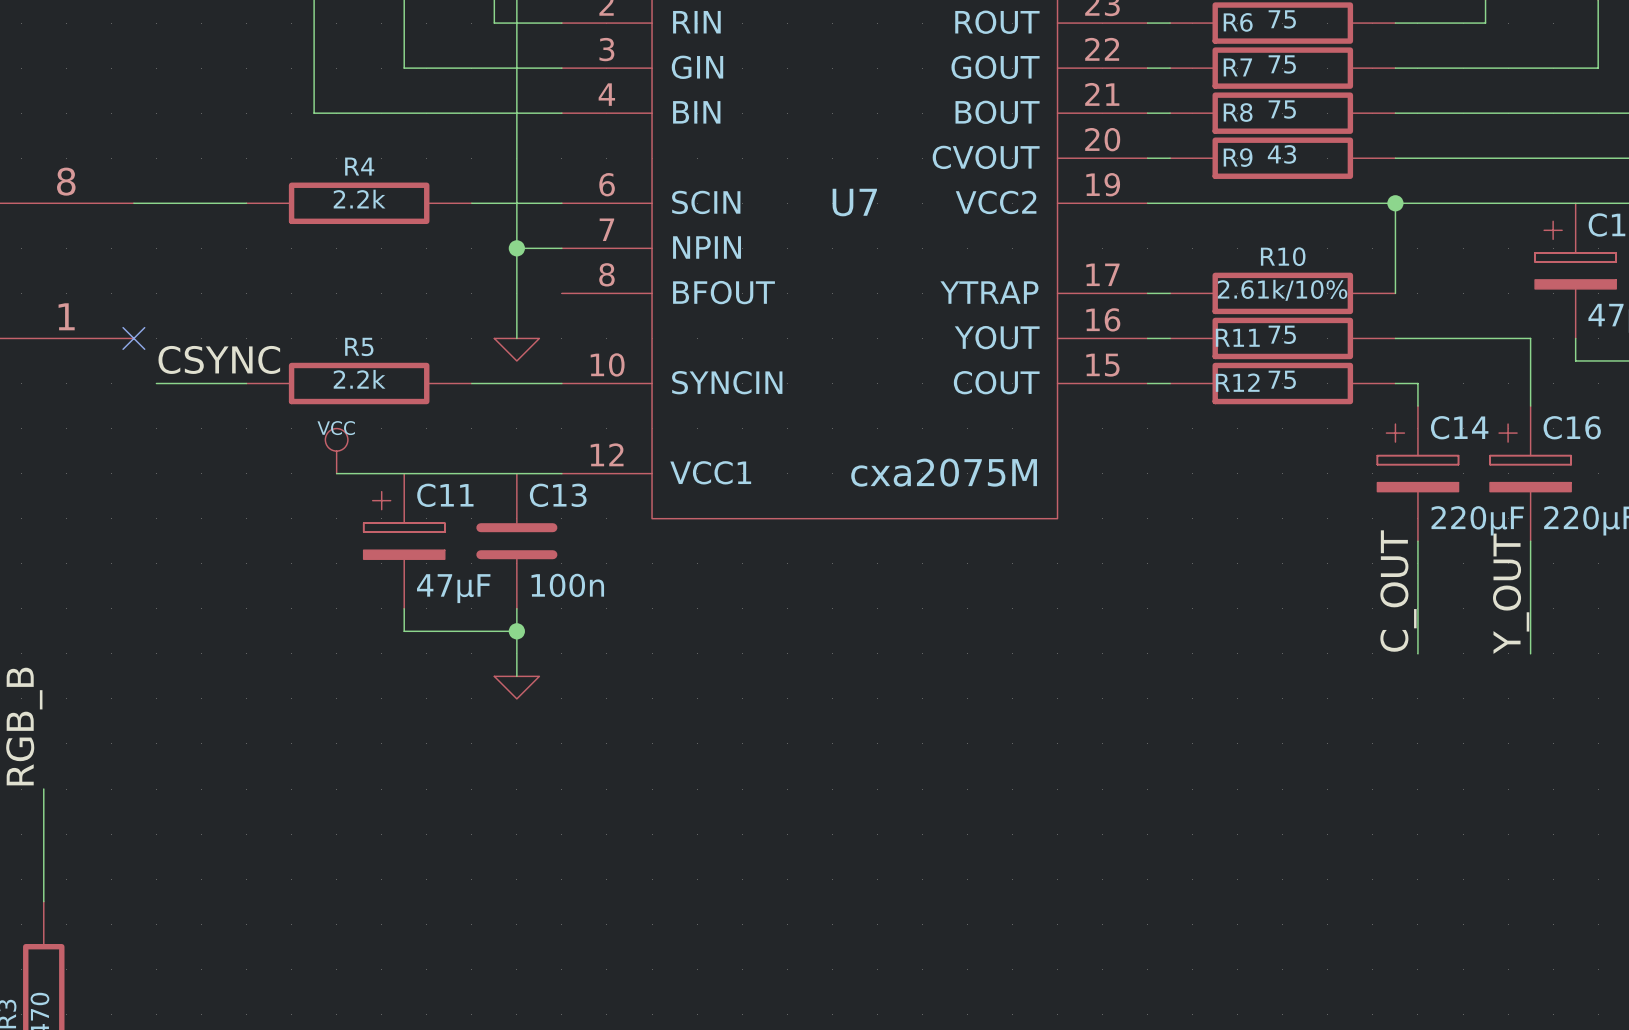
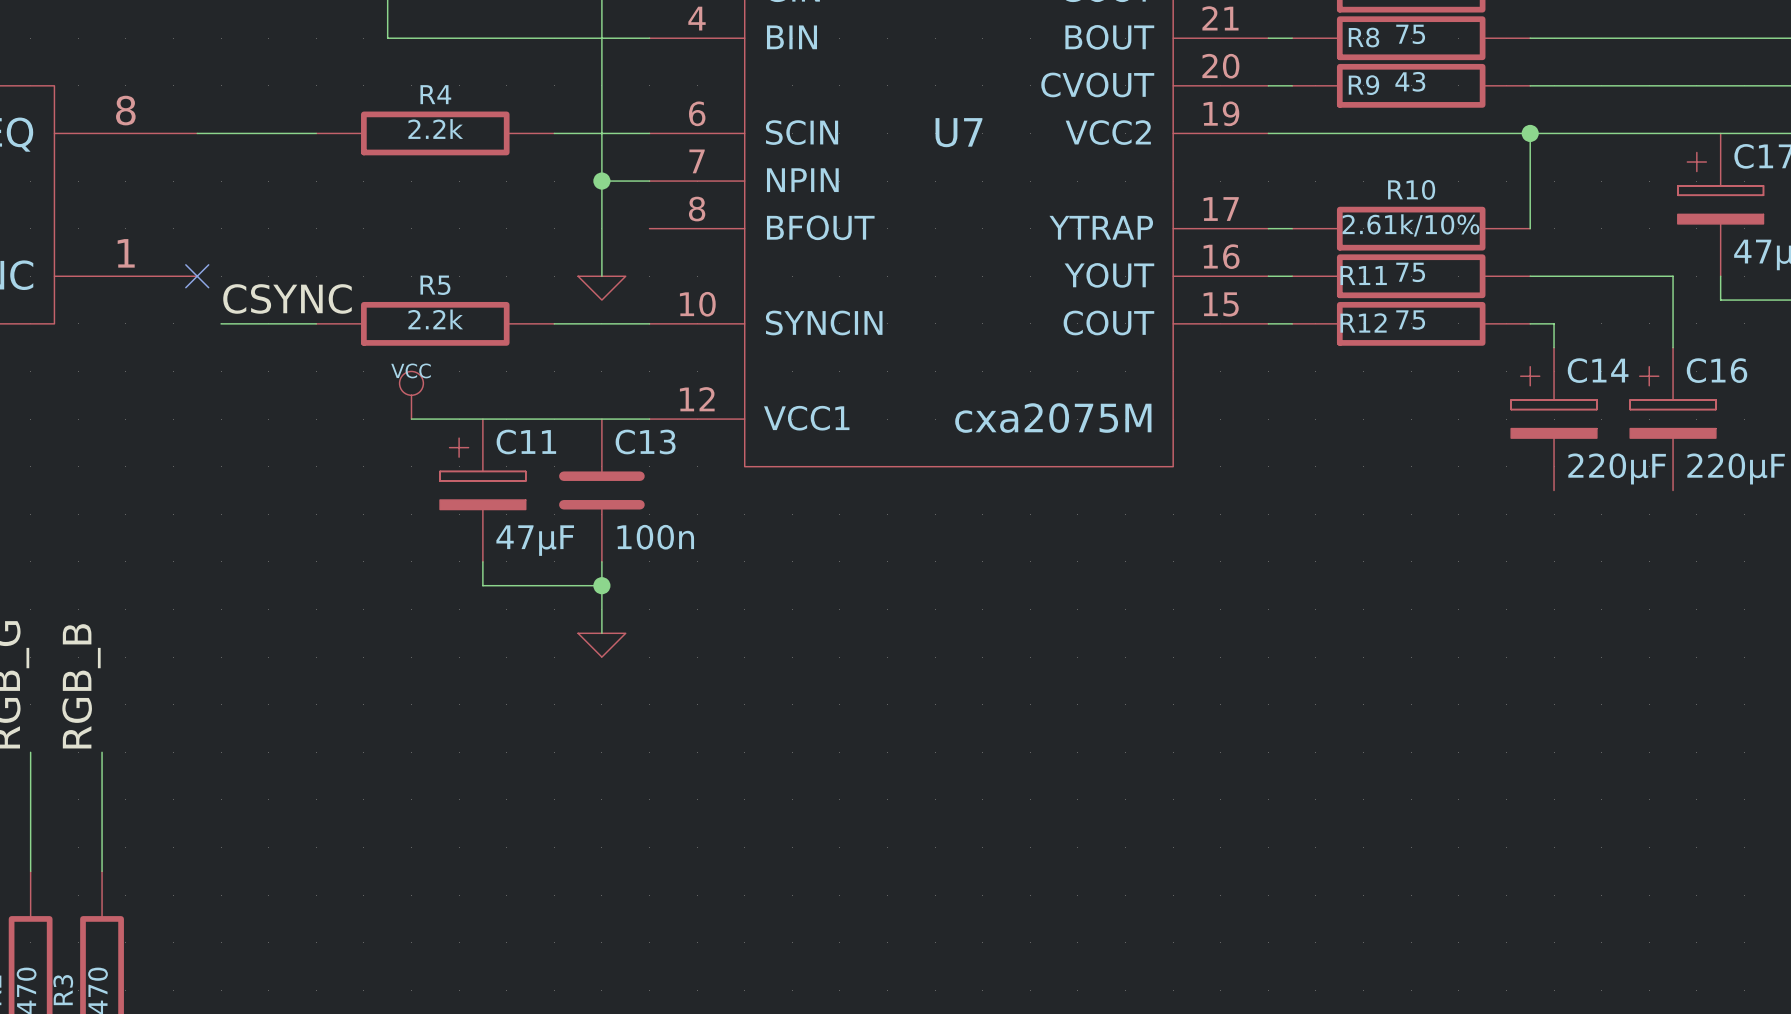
wire: (1417, 541) (1417, 653) -> none
wire: (1530, 541) (1530, 653) -> none
label: C_OUT (1398, 591) -> none
label: Y_OUT (1511, 593) -> none

